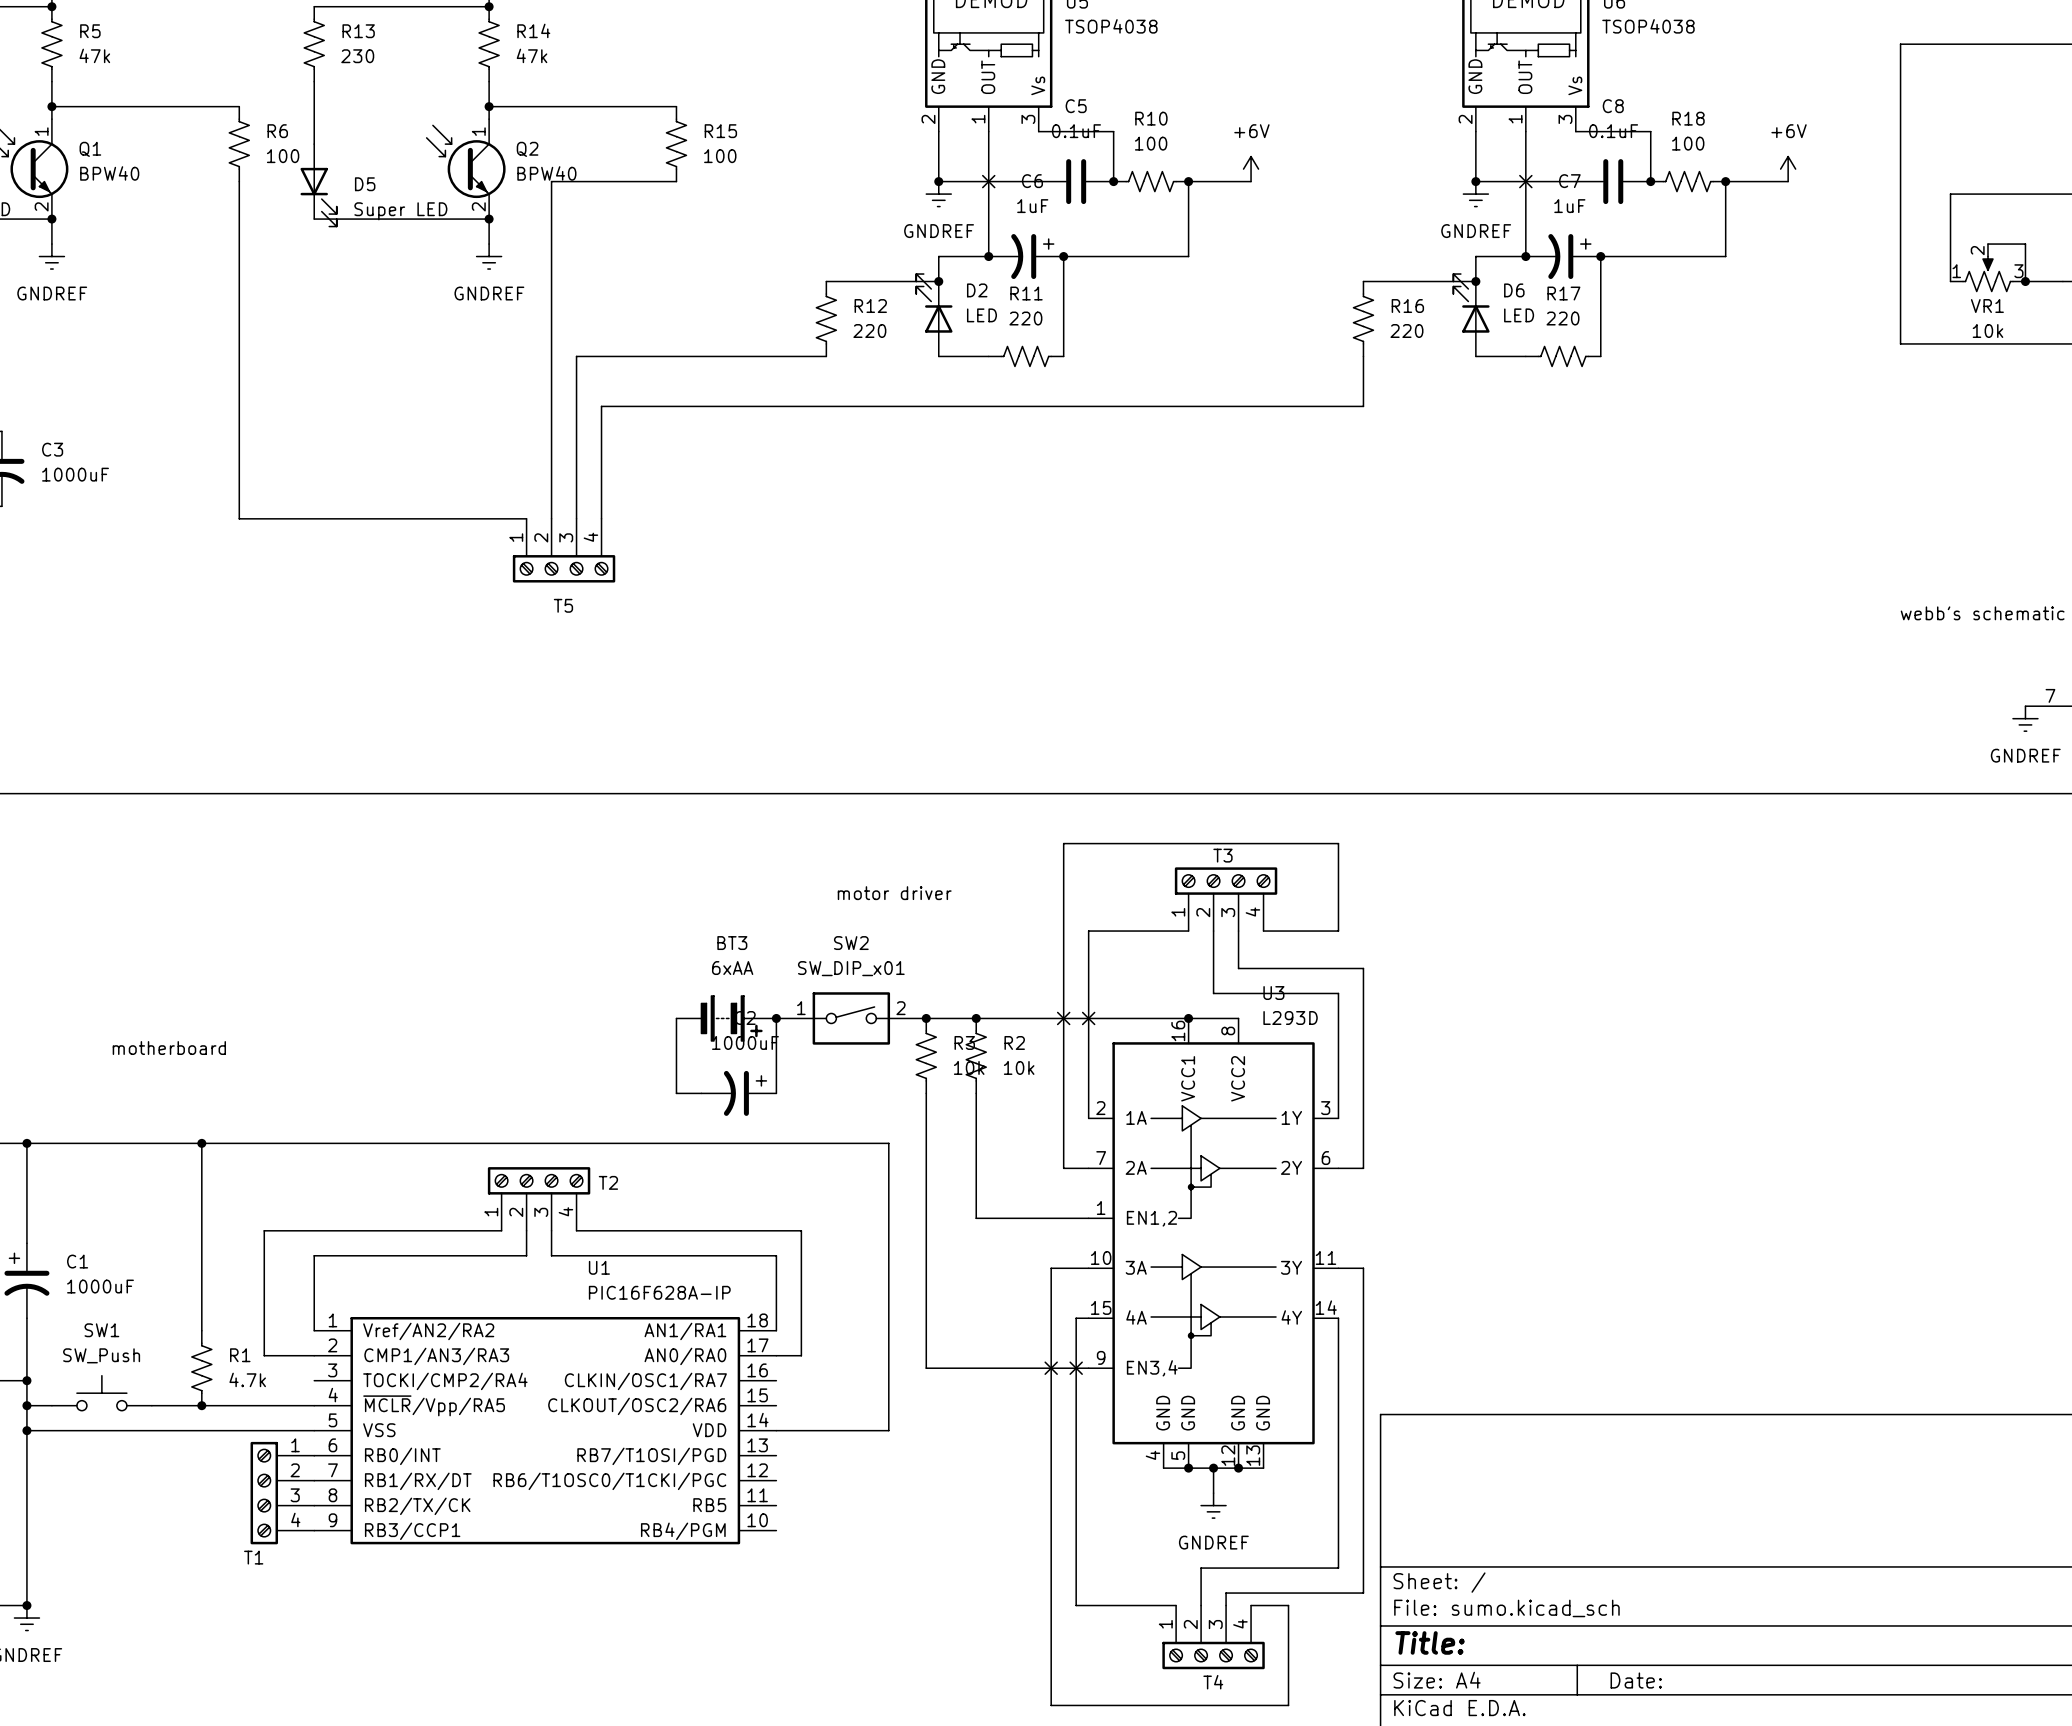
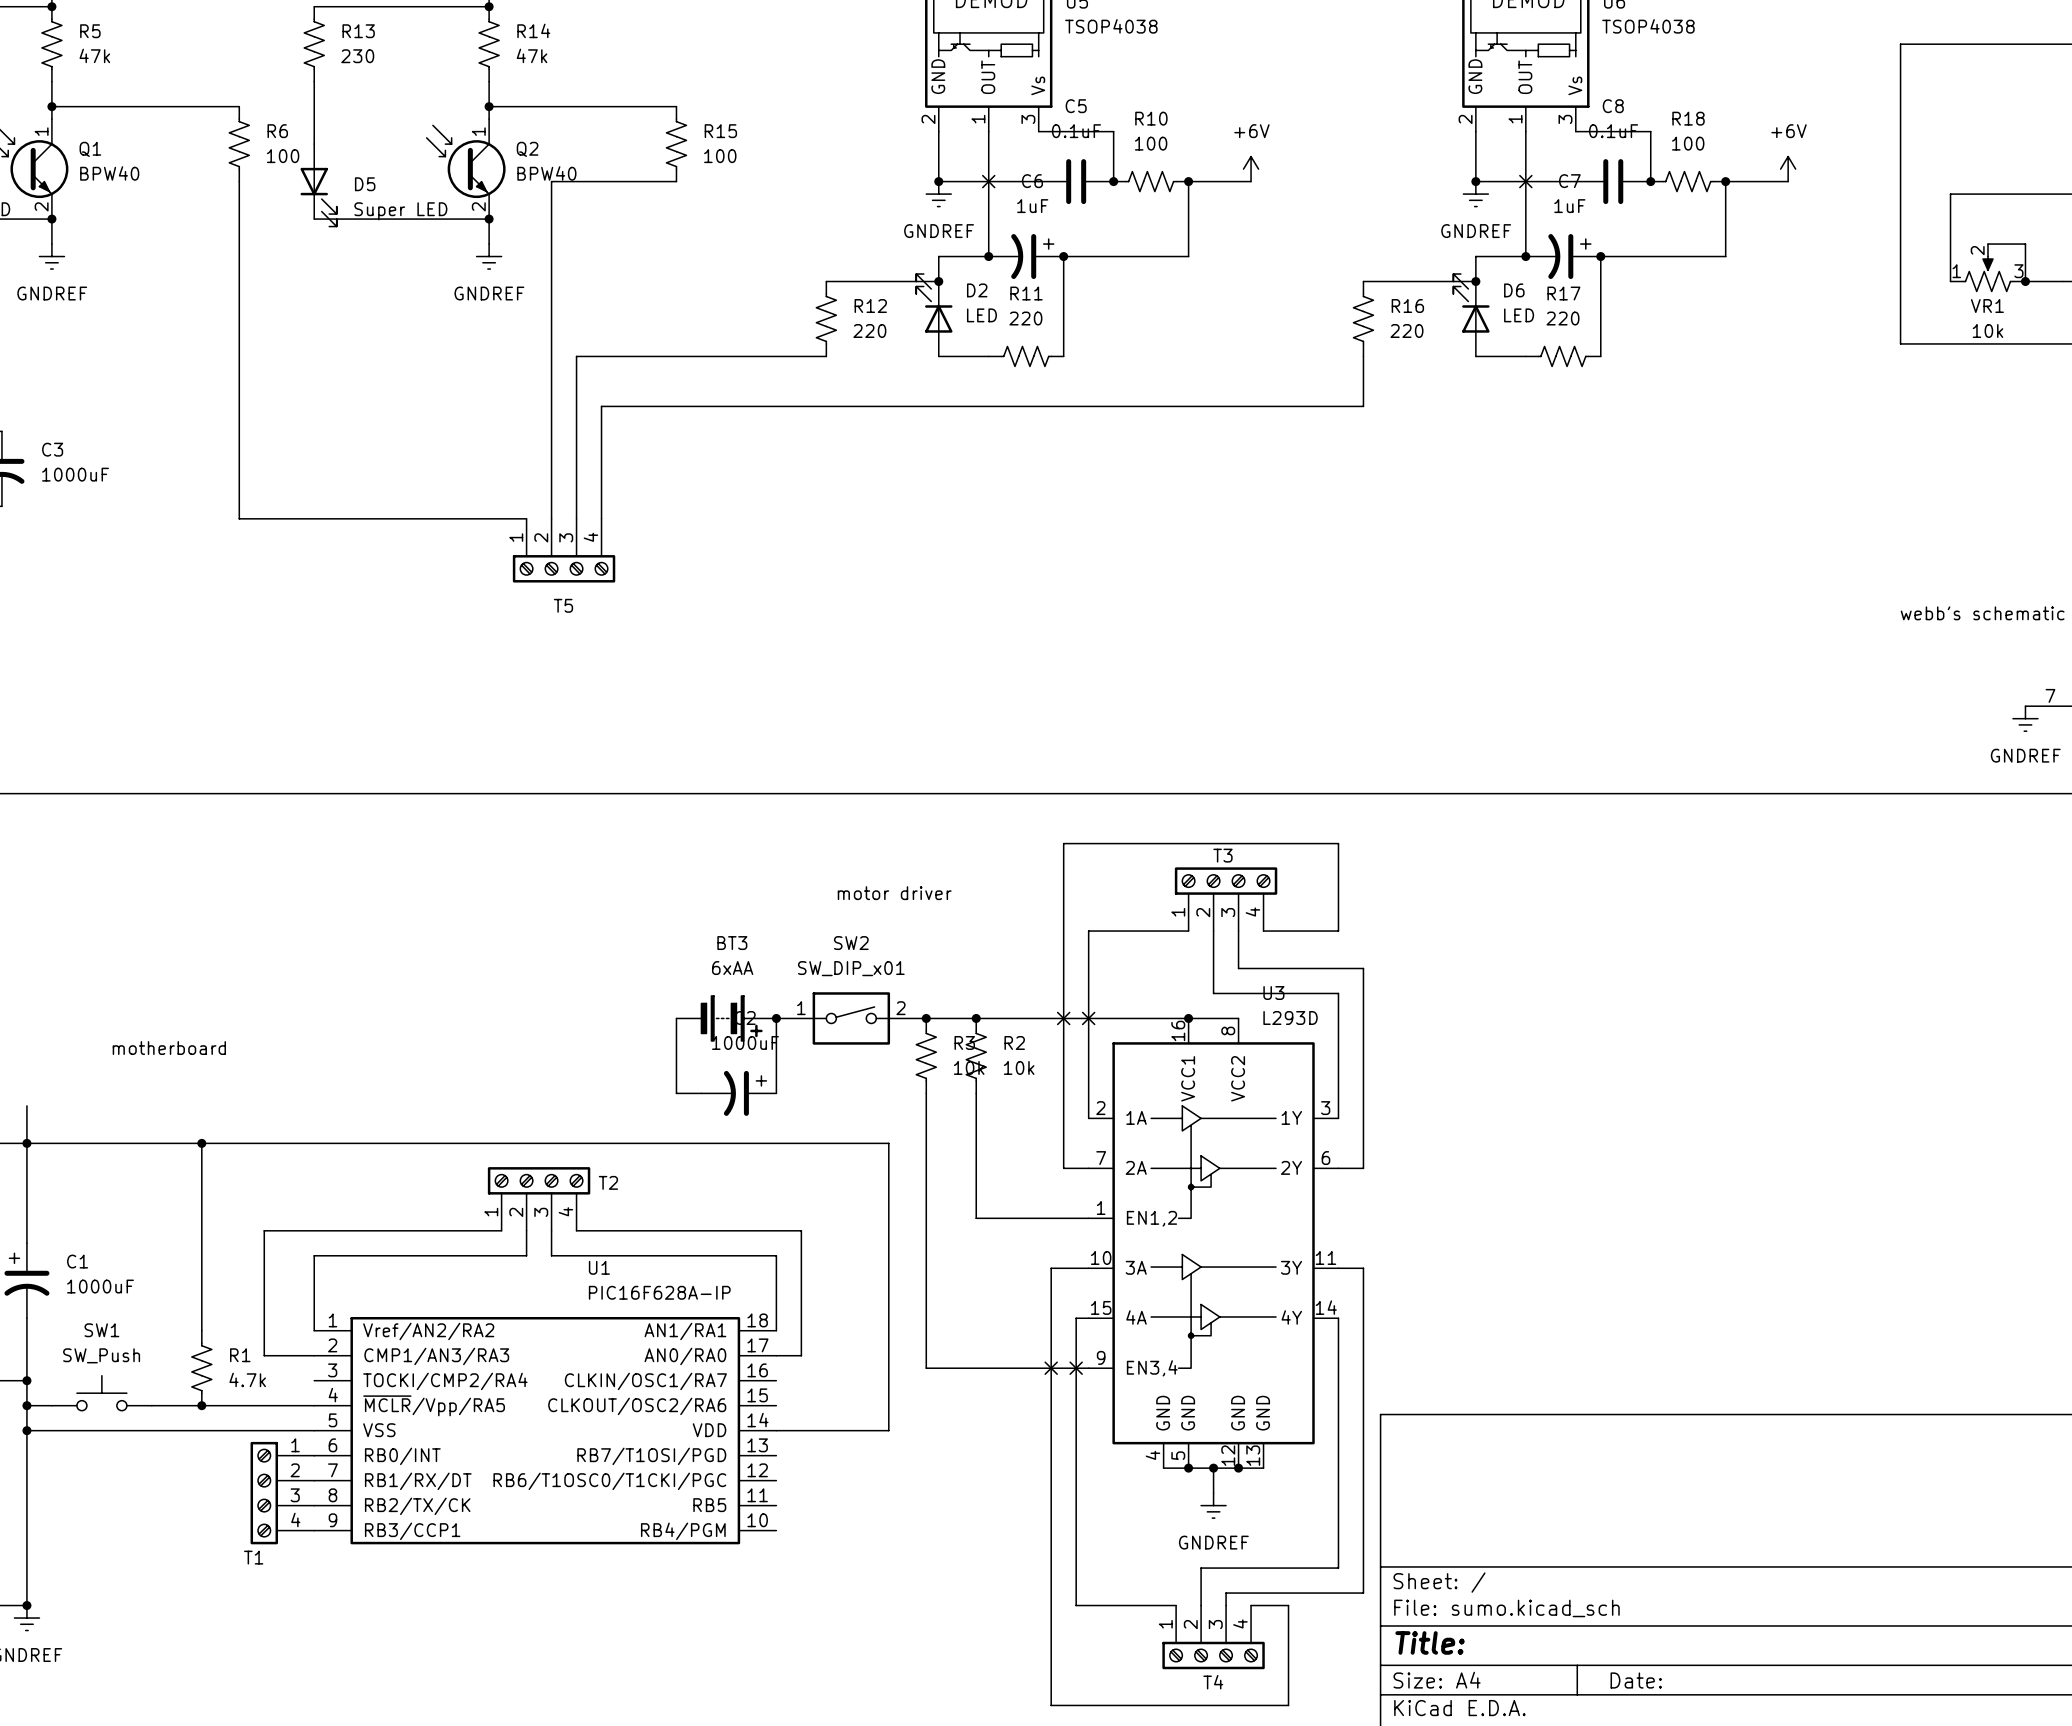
wire: none -> (26, 1105) (26, 1143)

